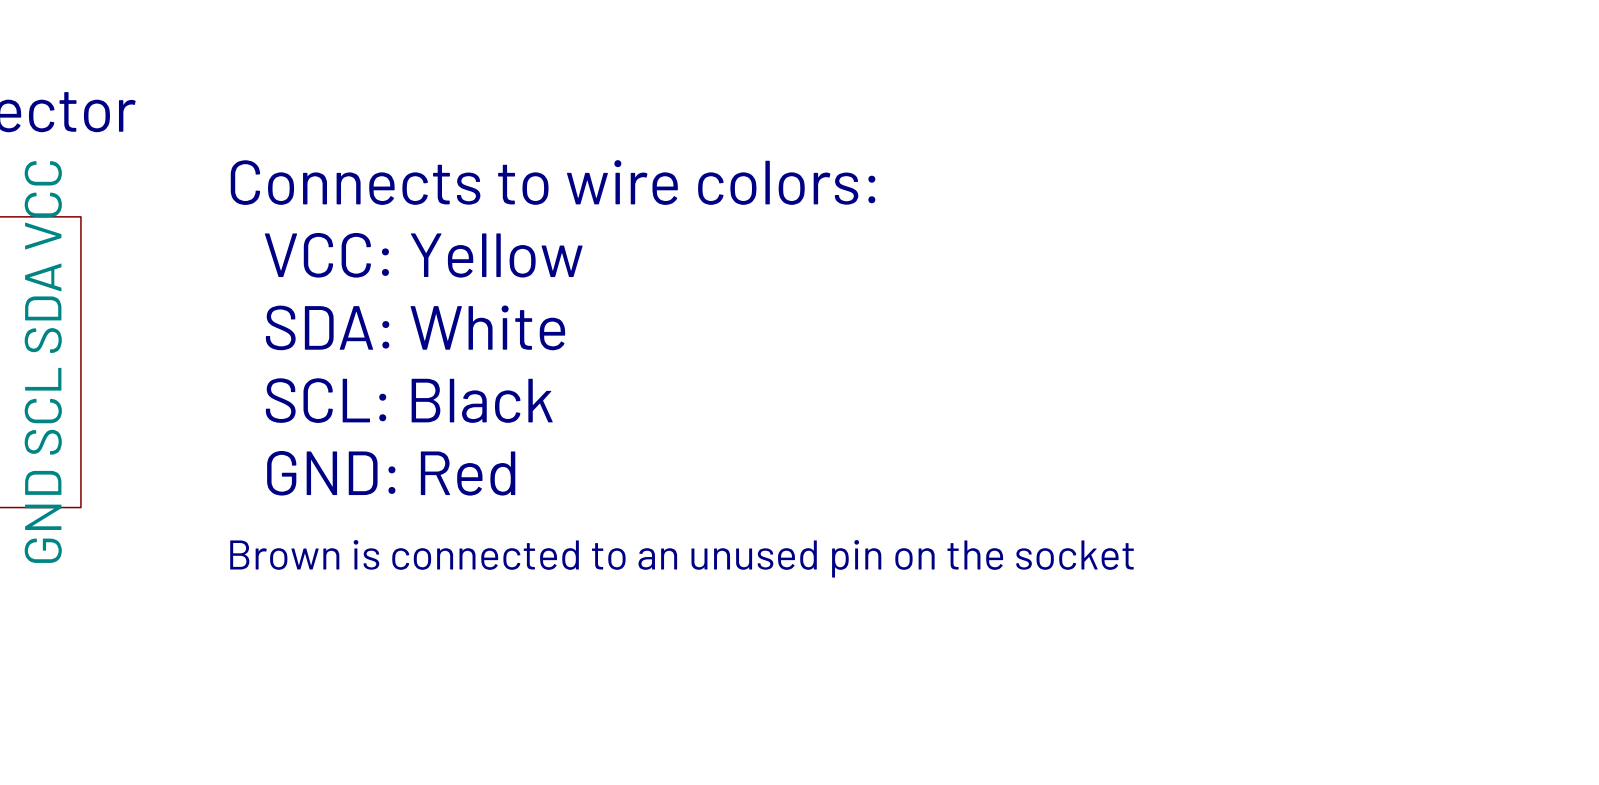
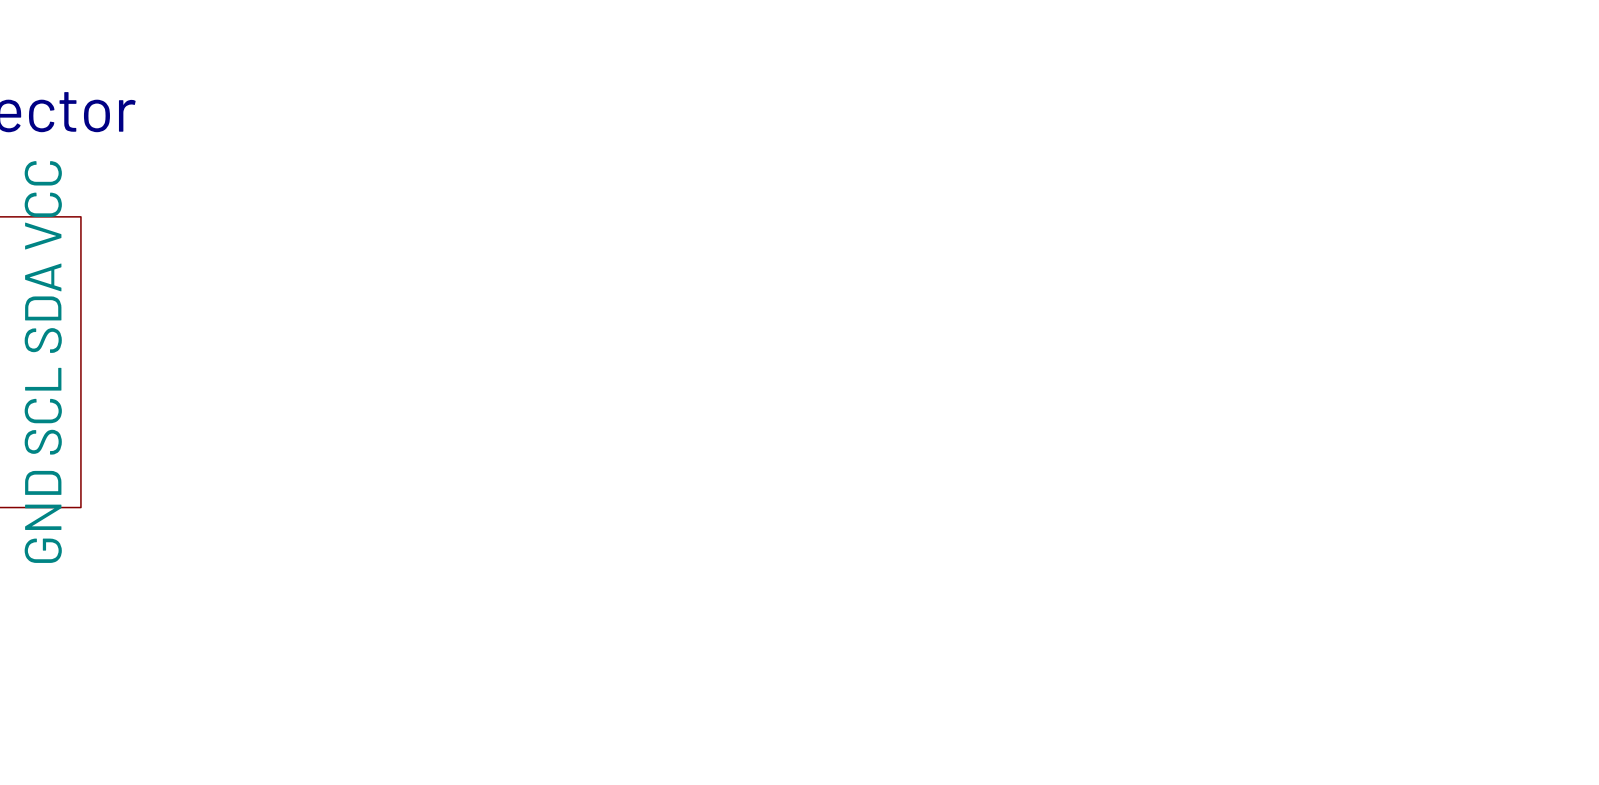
text: Connects to wire colors: (553, 182) -> none
text: VCC: Yellow (423, 255) -> none
text: SDA: White (415, 327) -> none
text: SCL: Black (409, 400) -> none
text: GND: Red (391, 473) -> none
text: Brown is connected to an unused pin on the socket (682, 558) -> none

